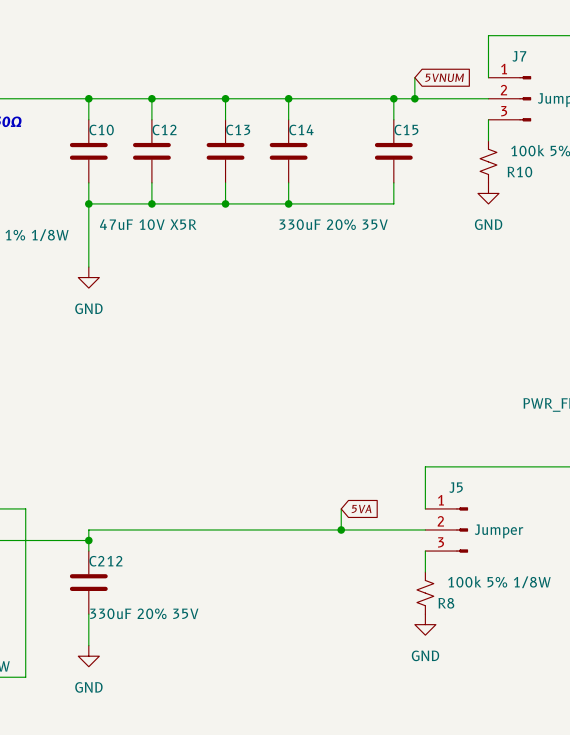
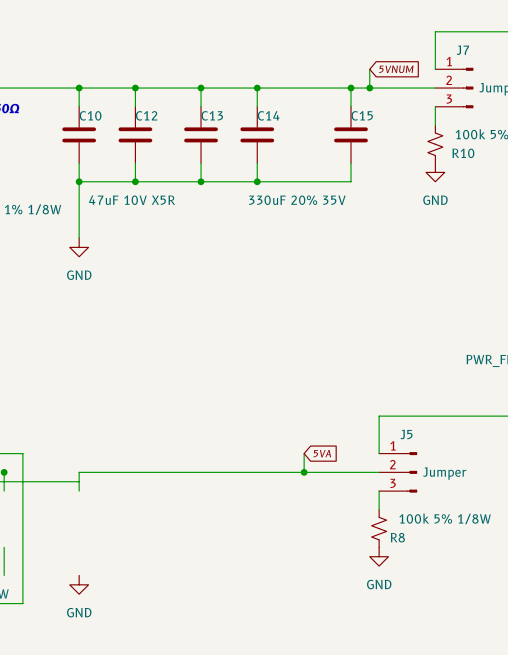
wire: none -> (4, 472) (4, 491)
junction: none -> (4, 472)
junction: (88, 540) -> none
C212: 330uF 20% 35V (88, 582) -> none
wire: (88, 614) (88, 645) -> (4, 547) (4, 575)

